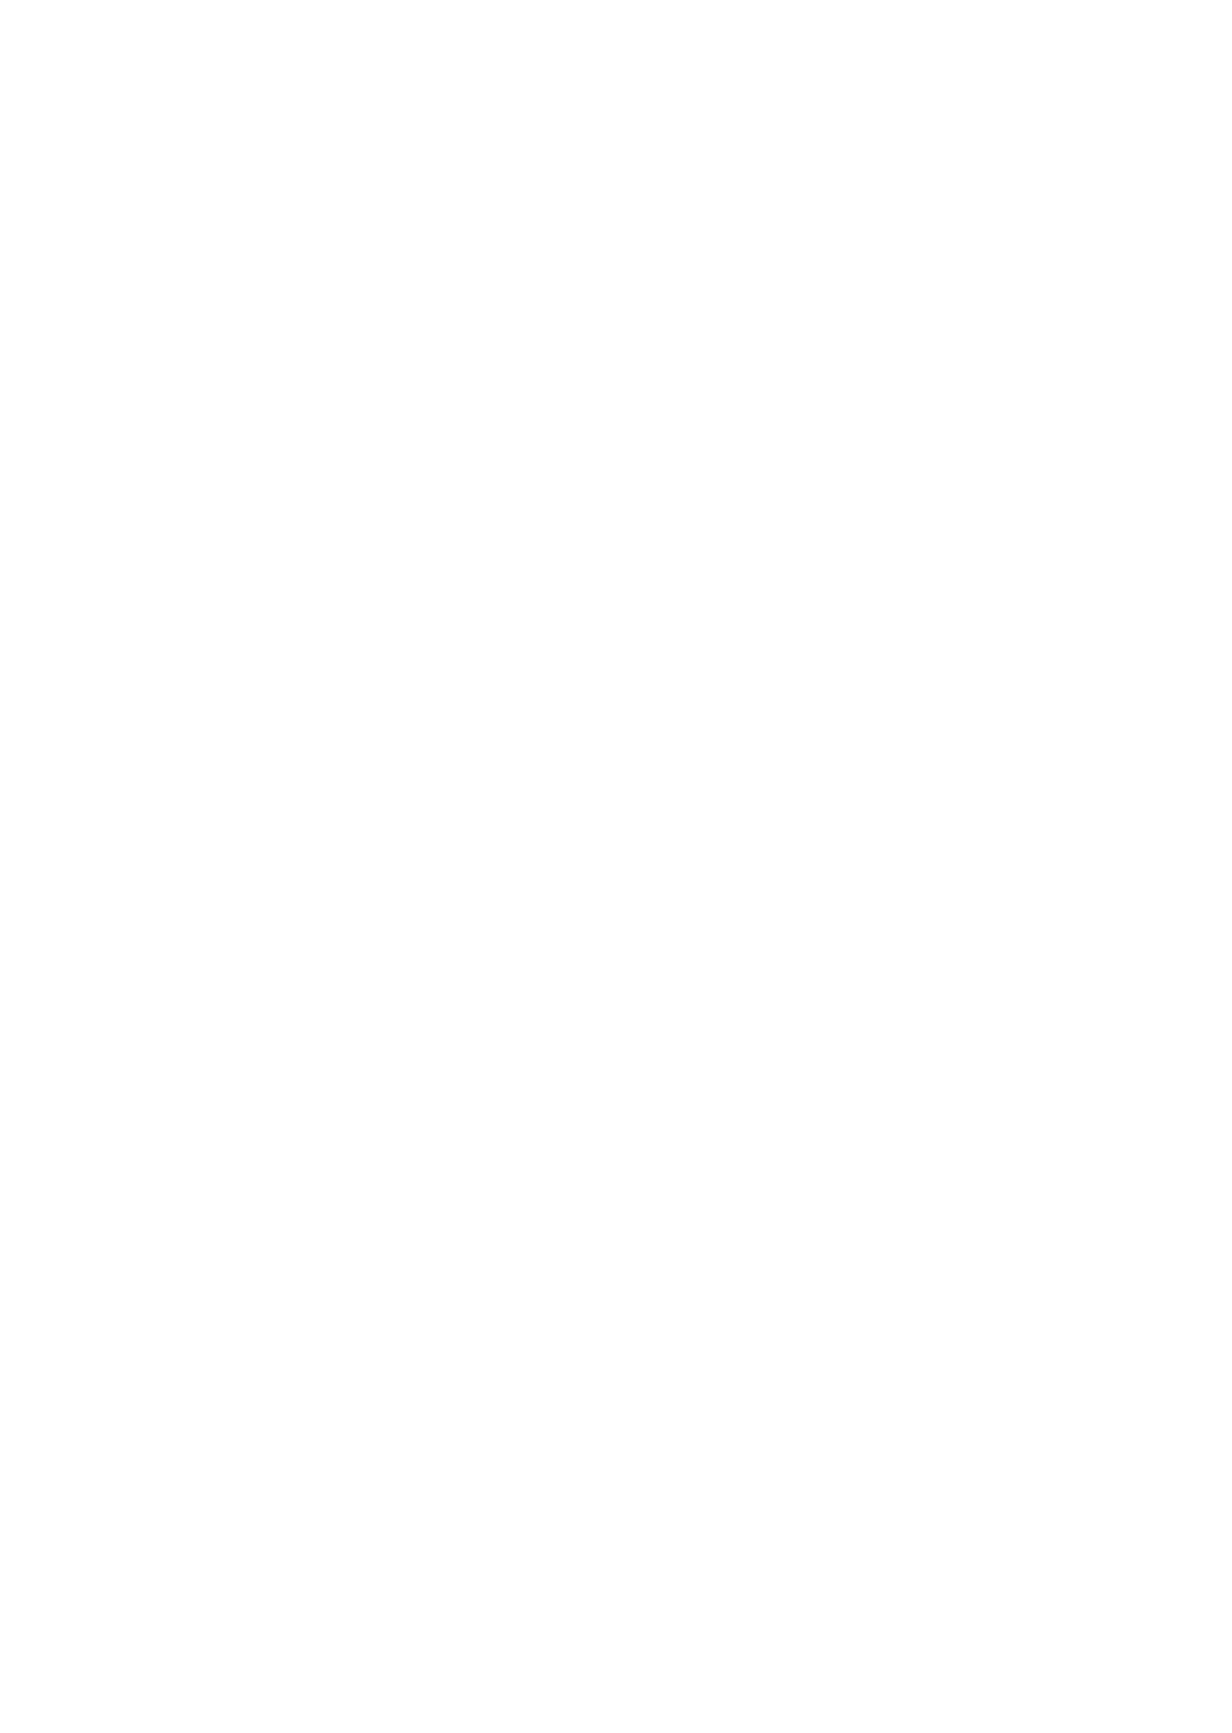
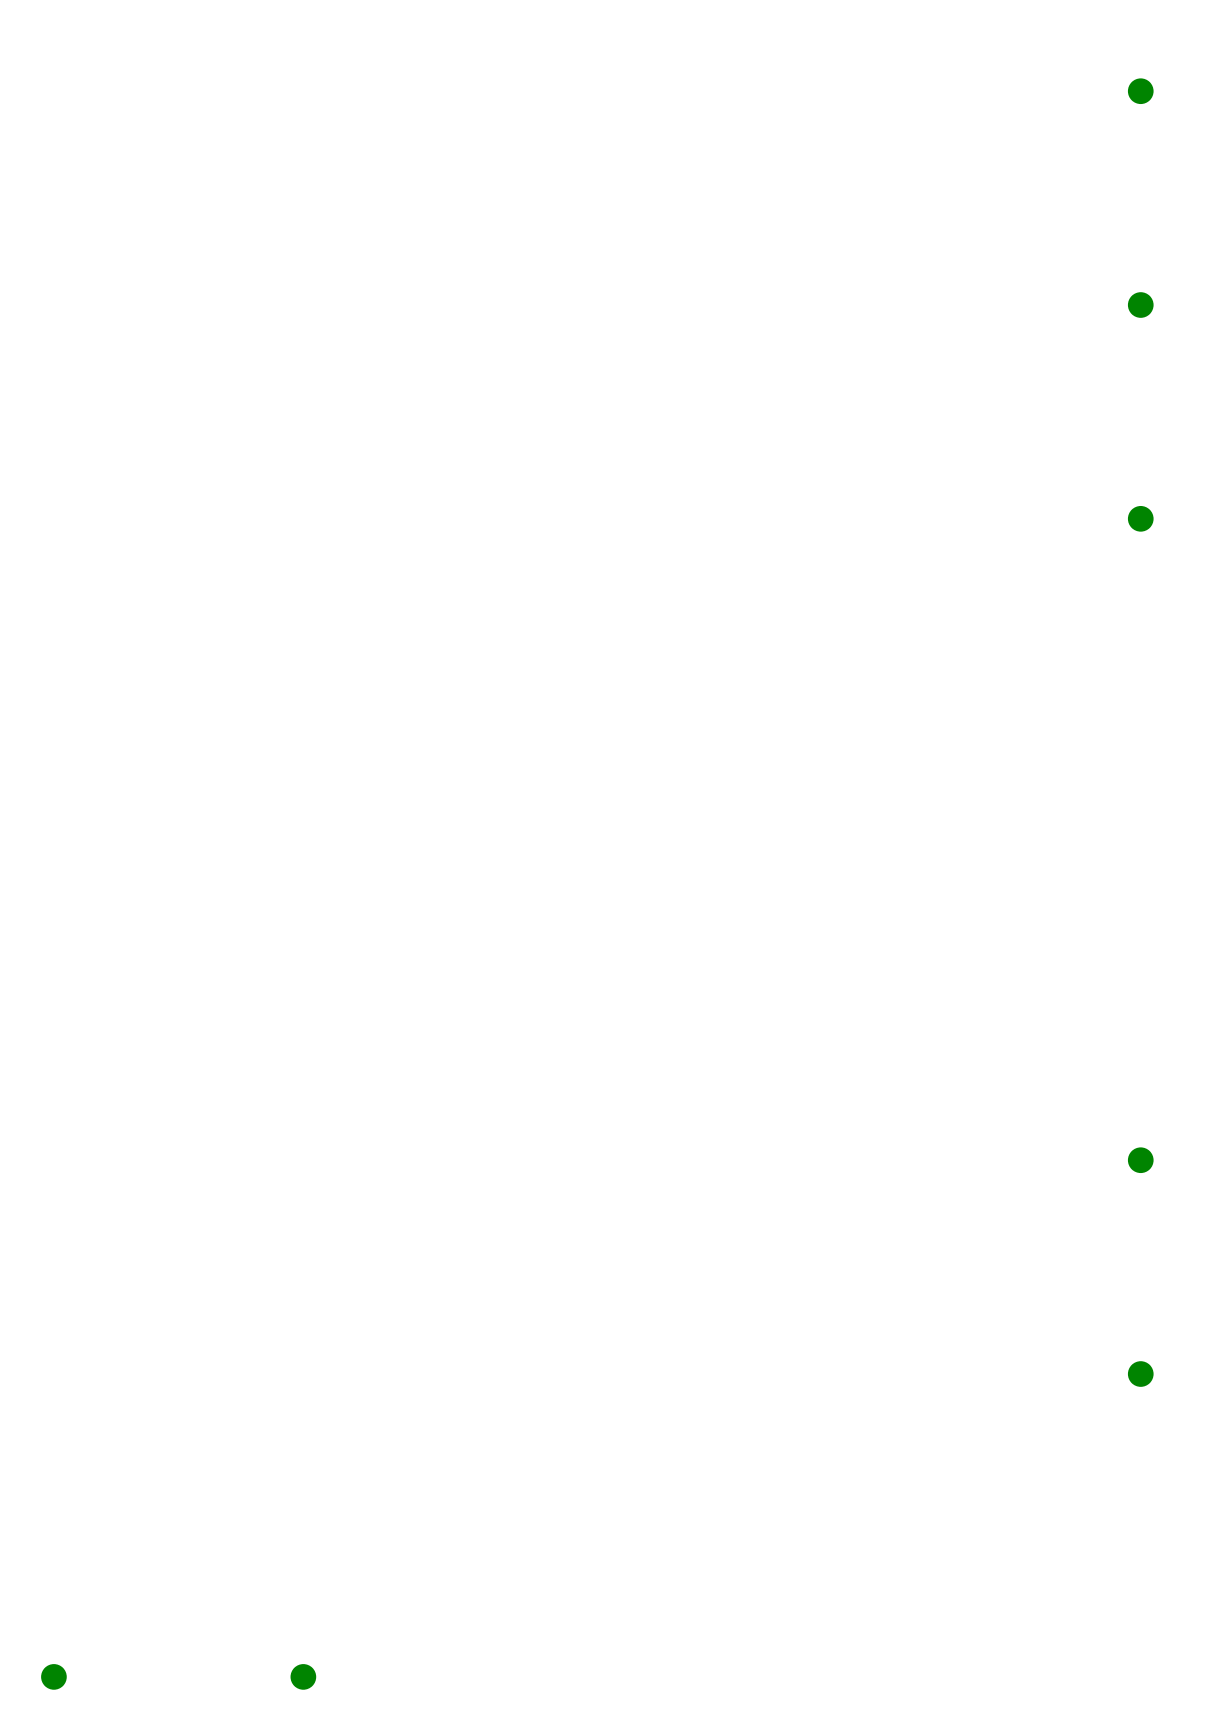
junction: none -> (1140, 91)
junction: none -> (1140, 305)
junction: none -> (1140, 518)
junction: none -> (1140, 1160)
junction: none -> (1140, 1374)
junction: none -> (53, 1676)
junction: none -> (303, 1676)

